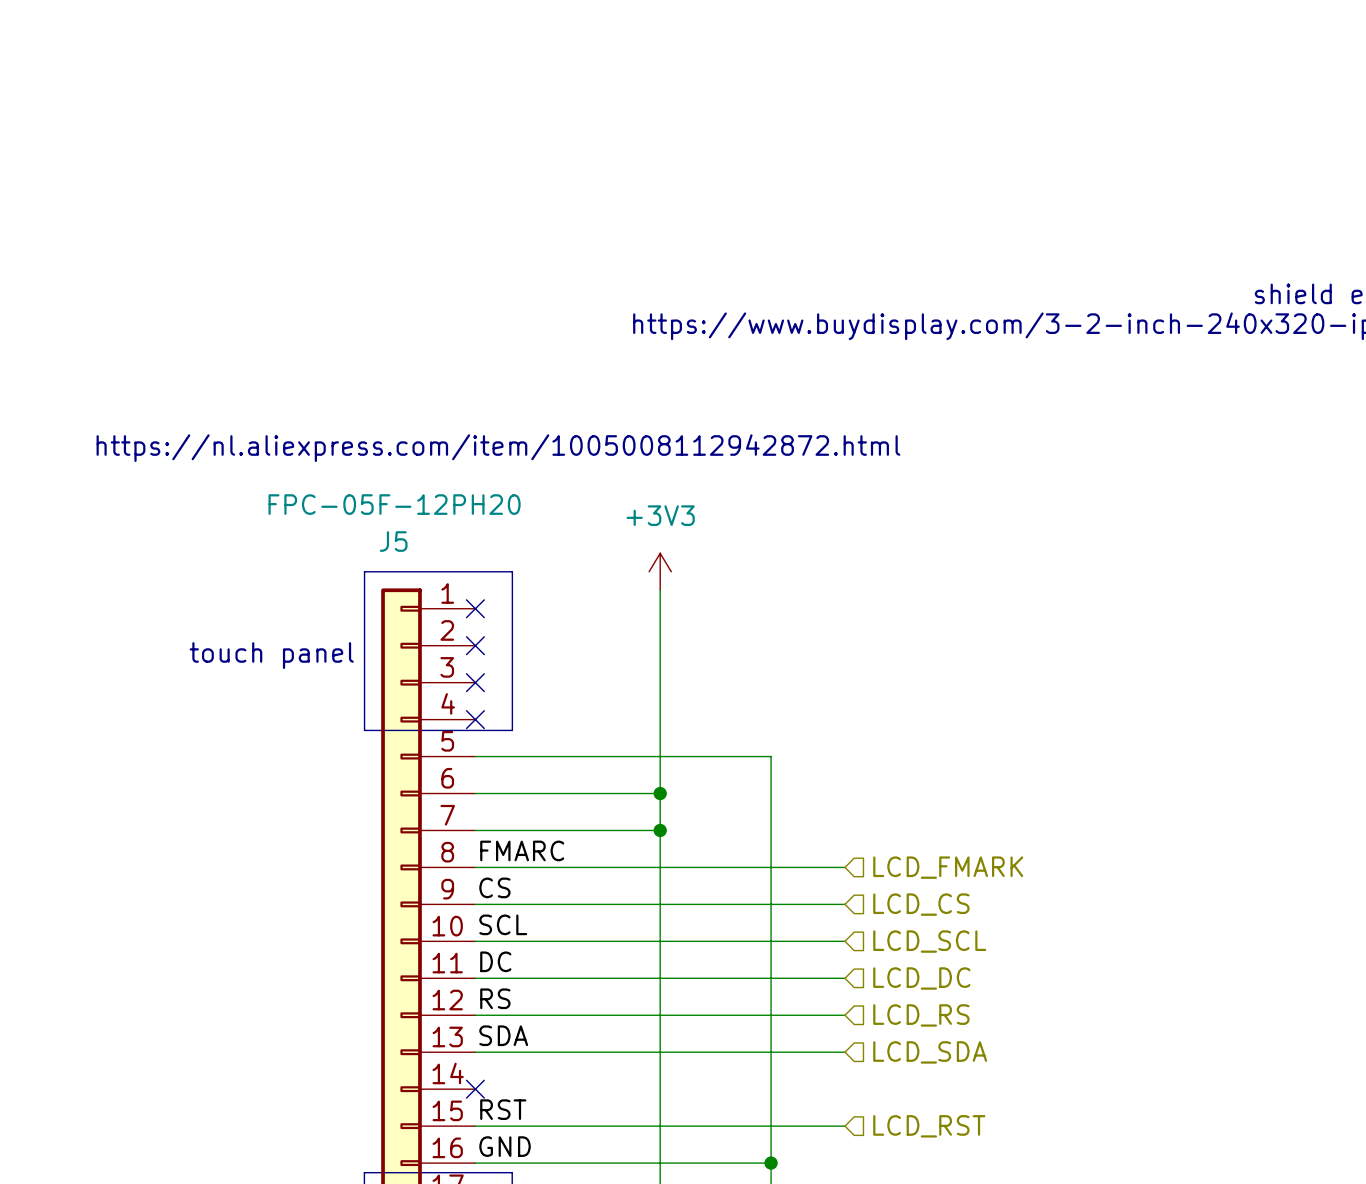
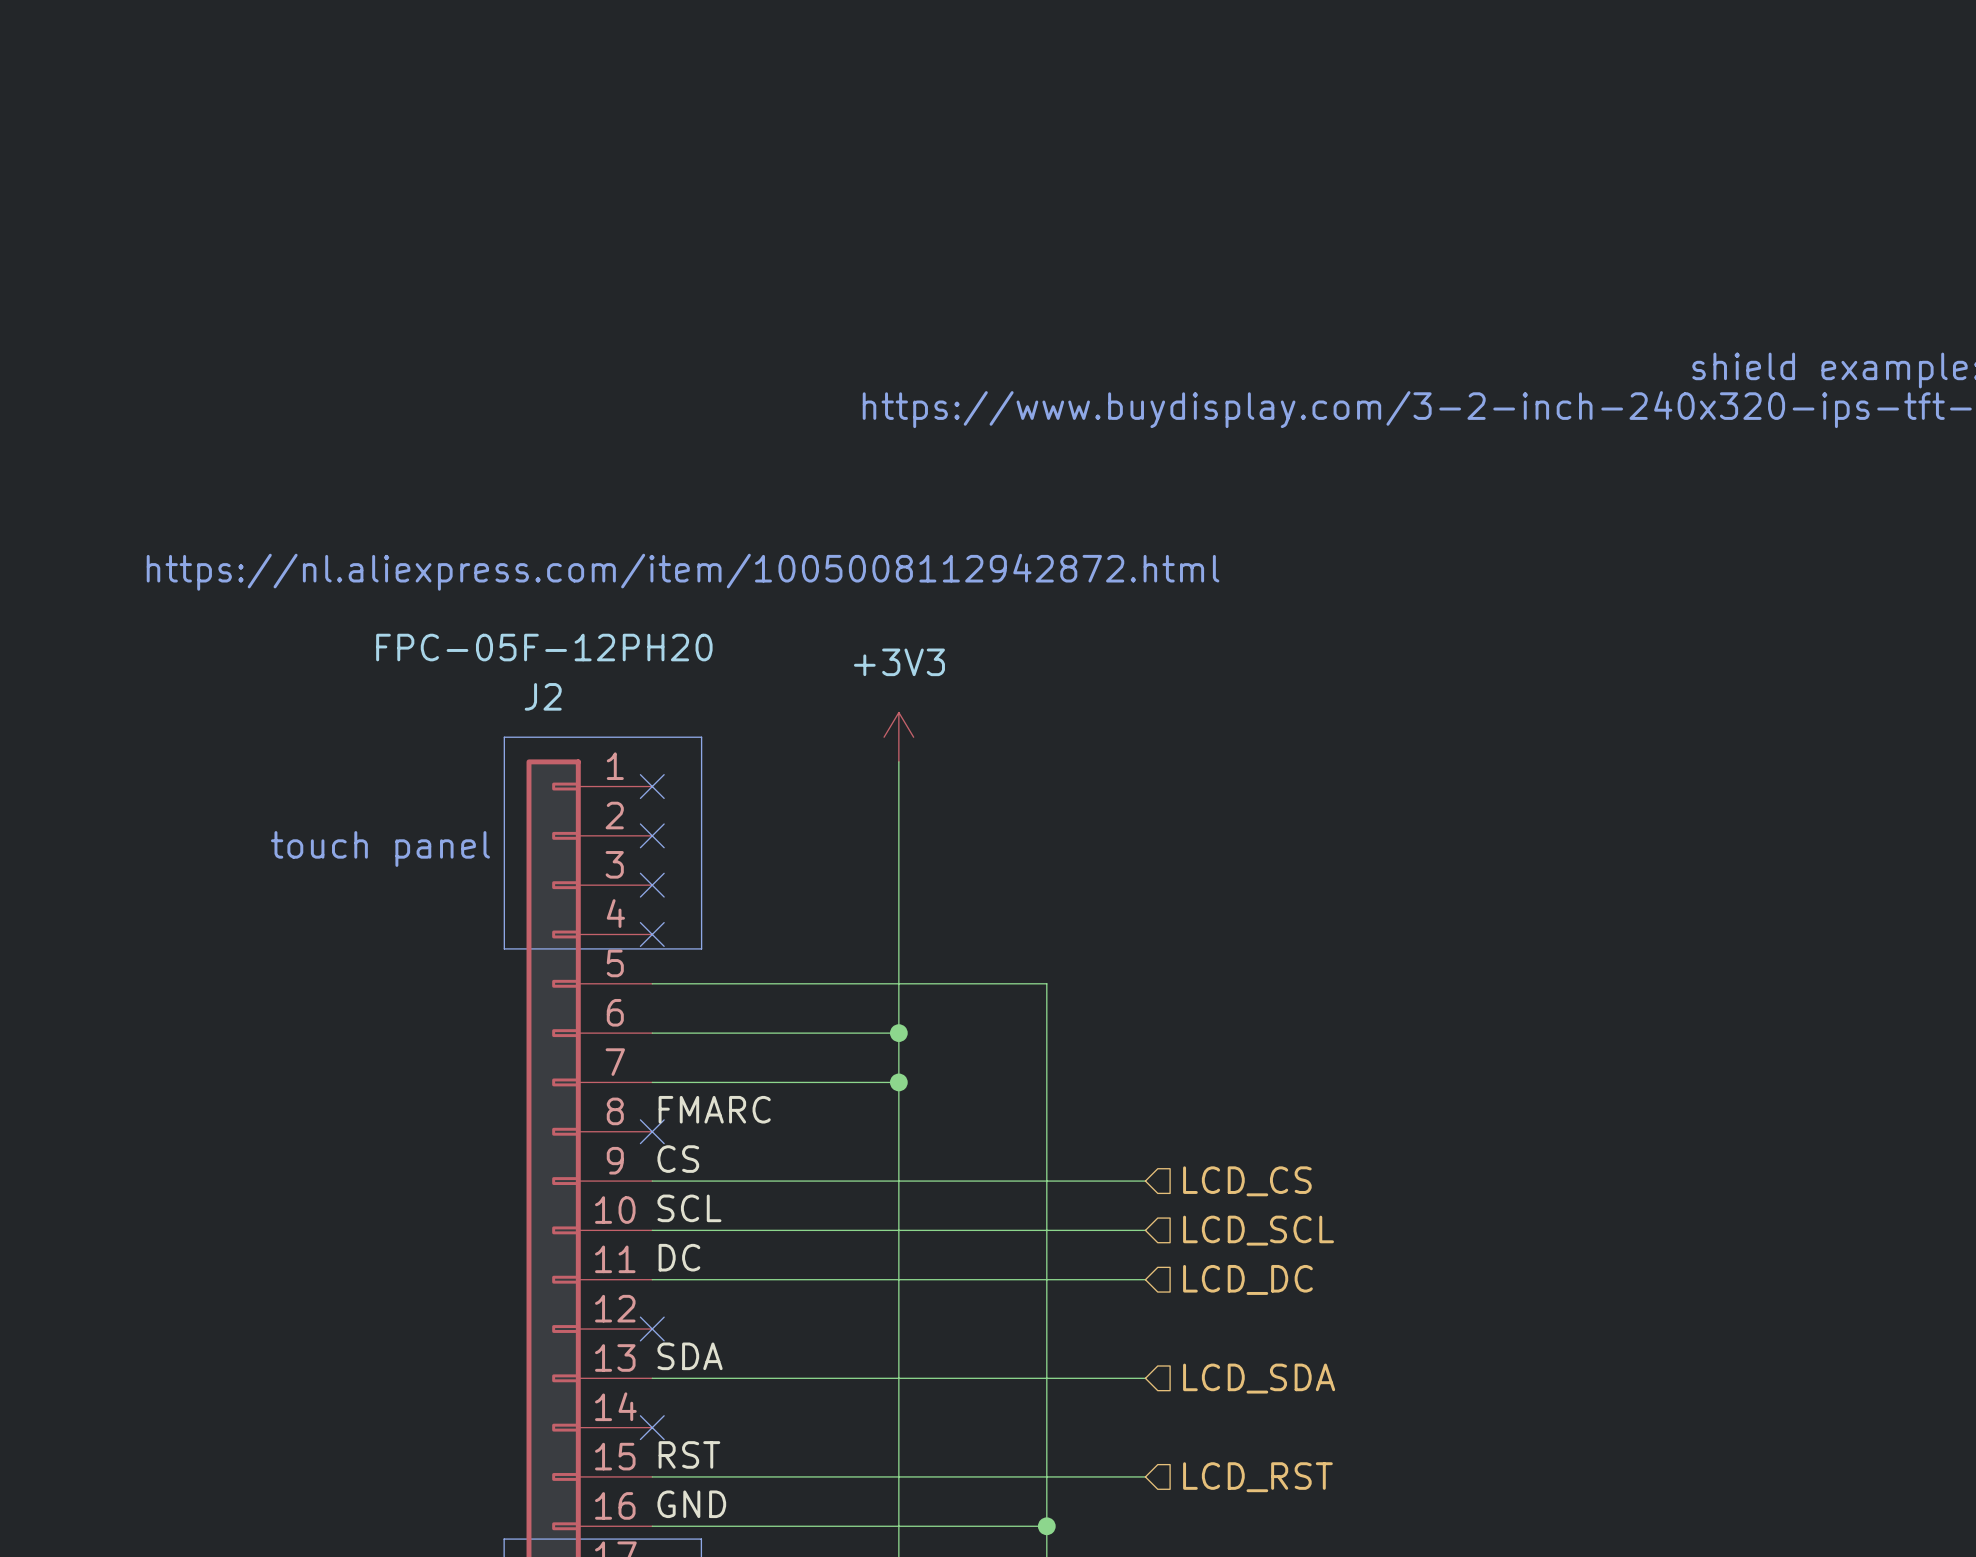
J5 name: J5 (393, 541) -> J2 (543, 696)
wire: (475, 867) (844, 867) -> none
no-connect mark: none -> (652, 1131)
hierarchical label: LCD_FMARK (948, 867) -> none
label: RS (495, 998) -> none
wire: (475, 1015) (844, 1015) -> none
no-connect mark: none -> (652, 1329)
hierarchical label: LCD_RS (921, 1015) -> none

